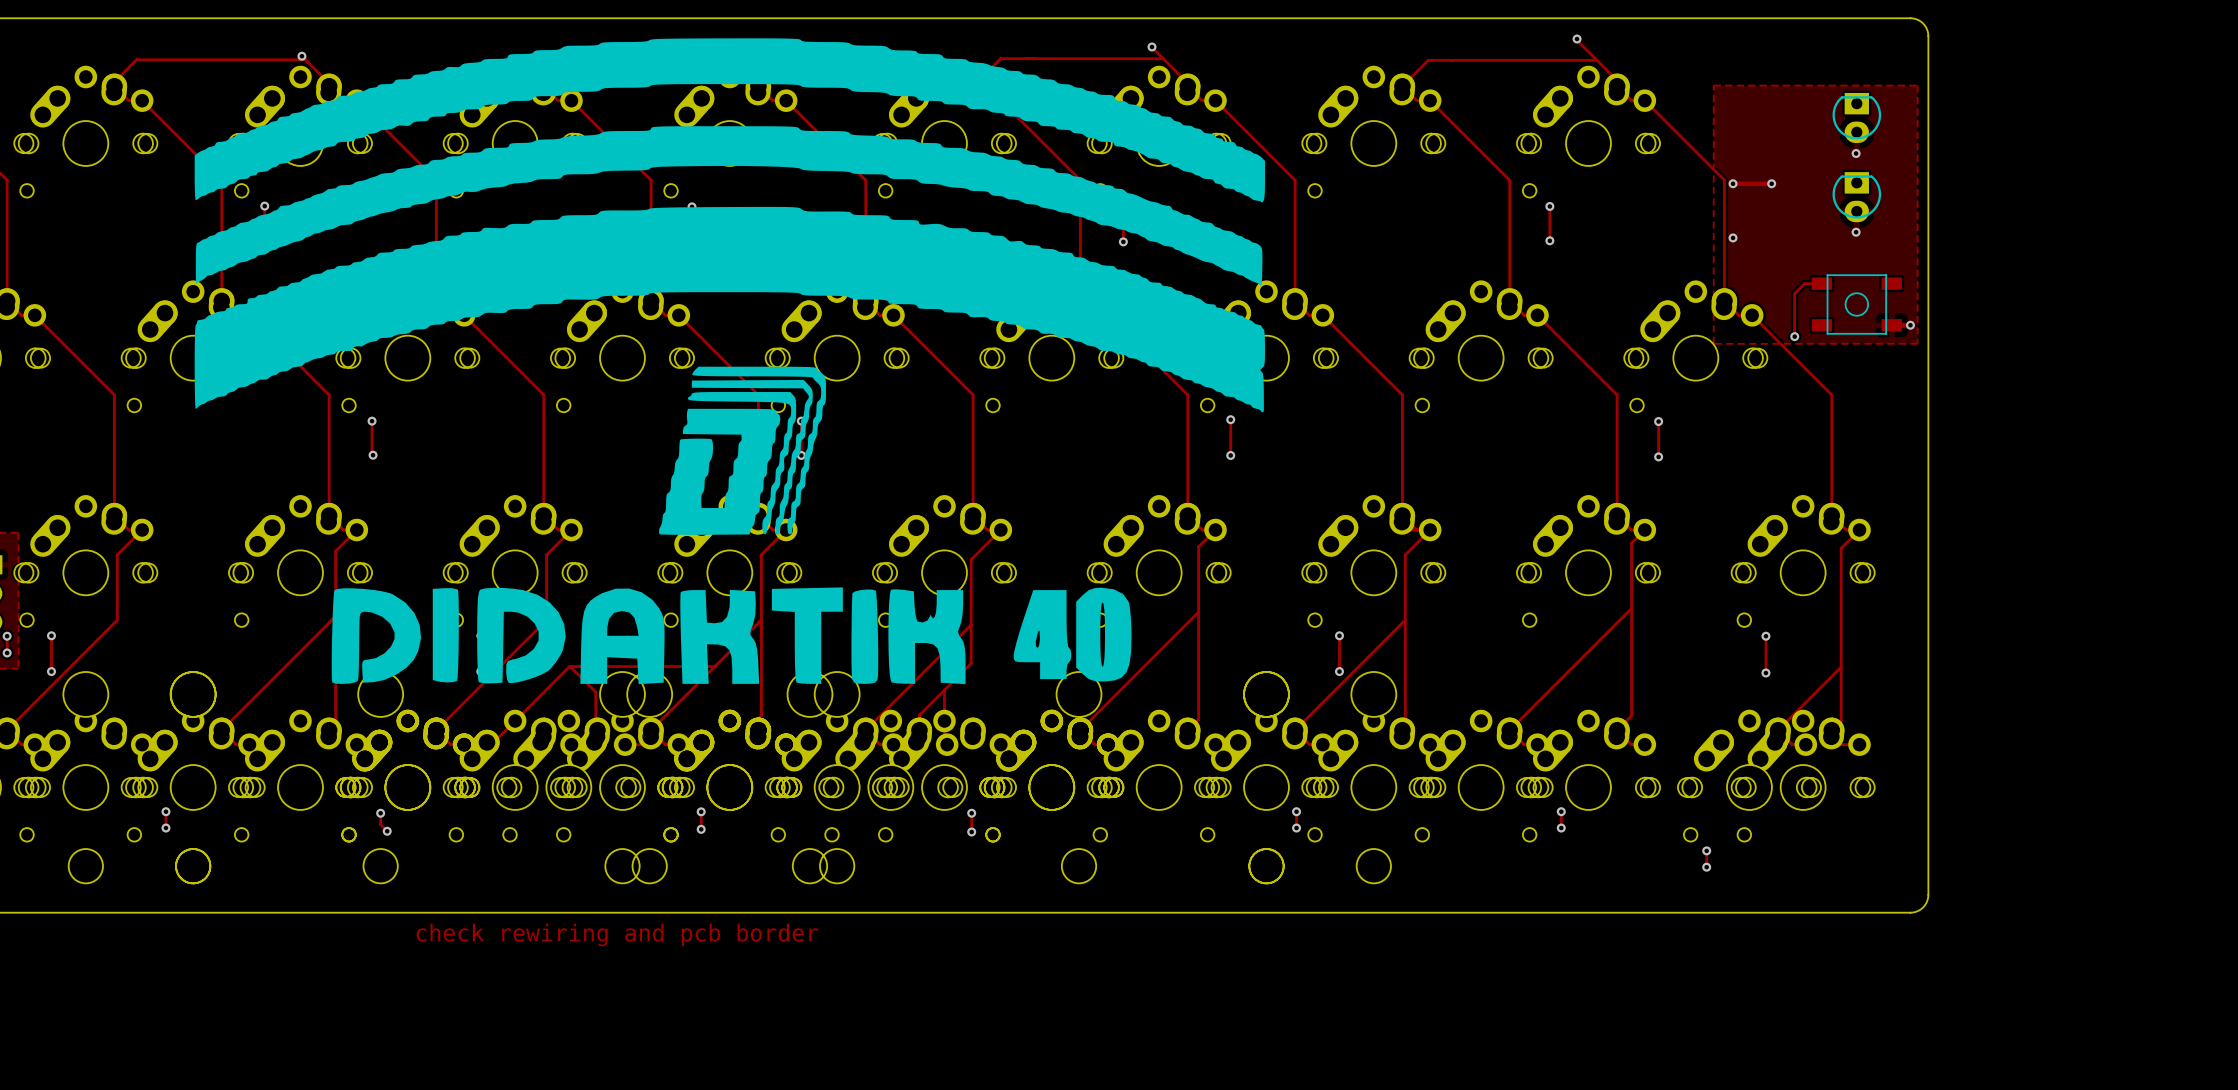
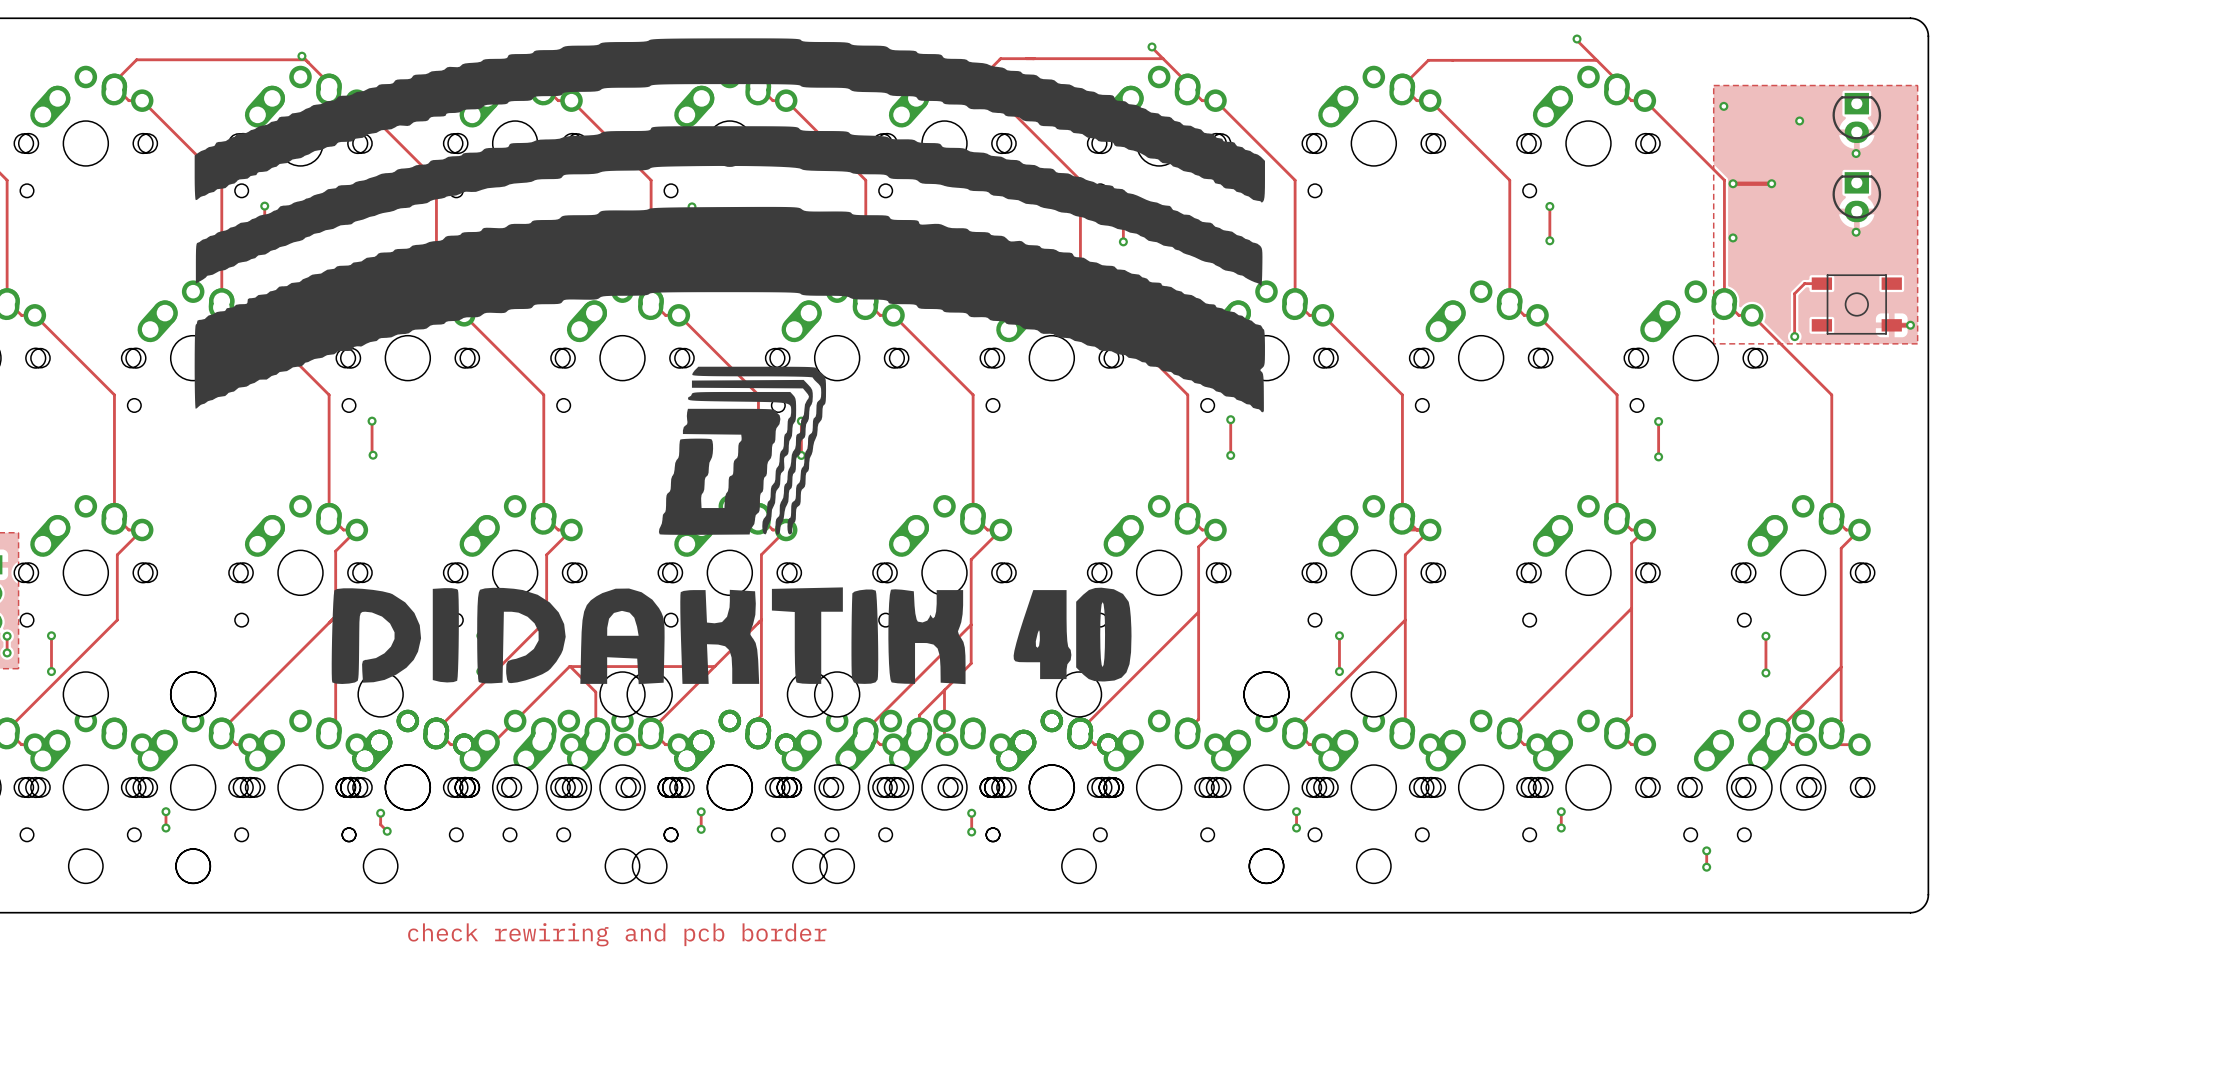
via: none -> (1723, 106)
via: none -> (1799, 120)

